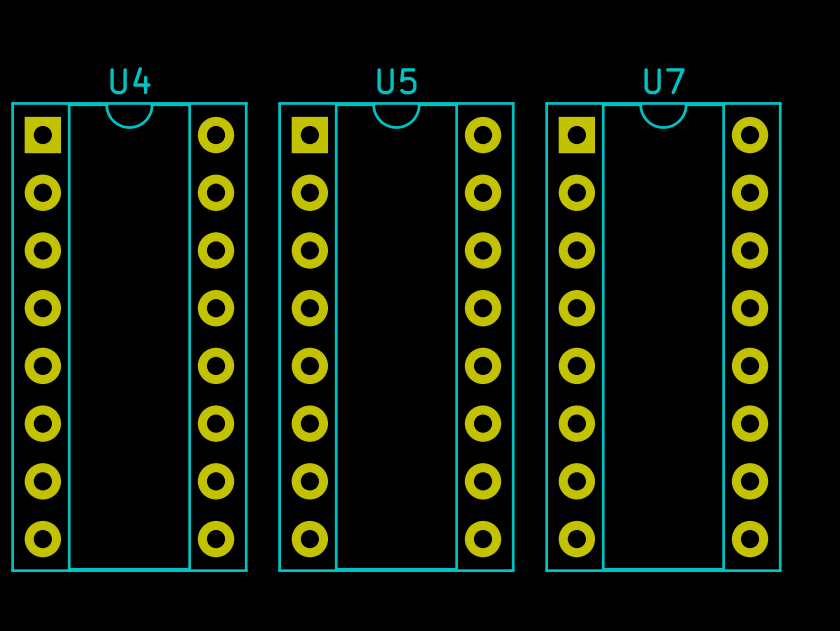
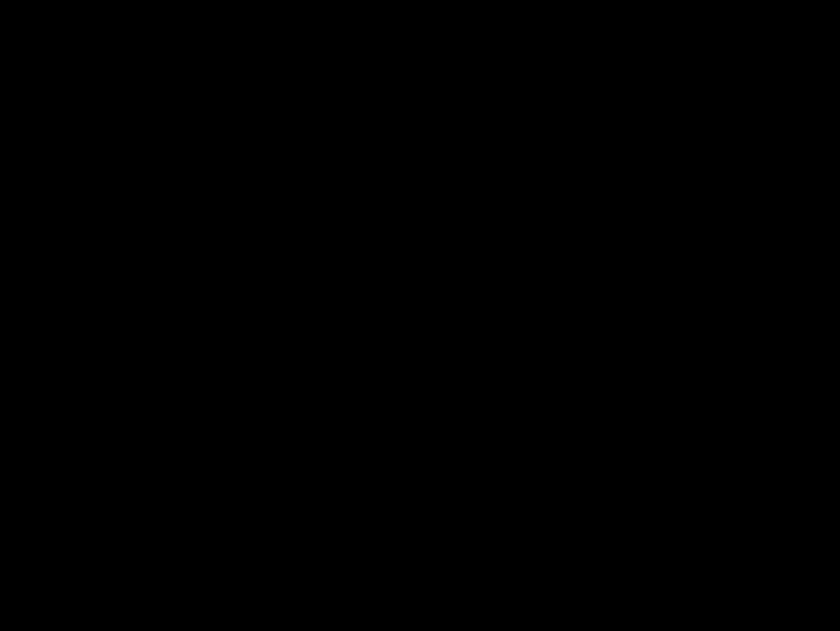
U4: (129, 337) -> none
U5: (396, 337) -> none
U7: (663, 337) -> none

